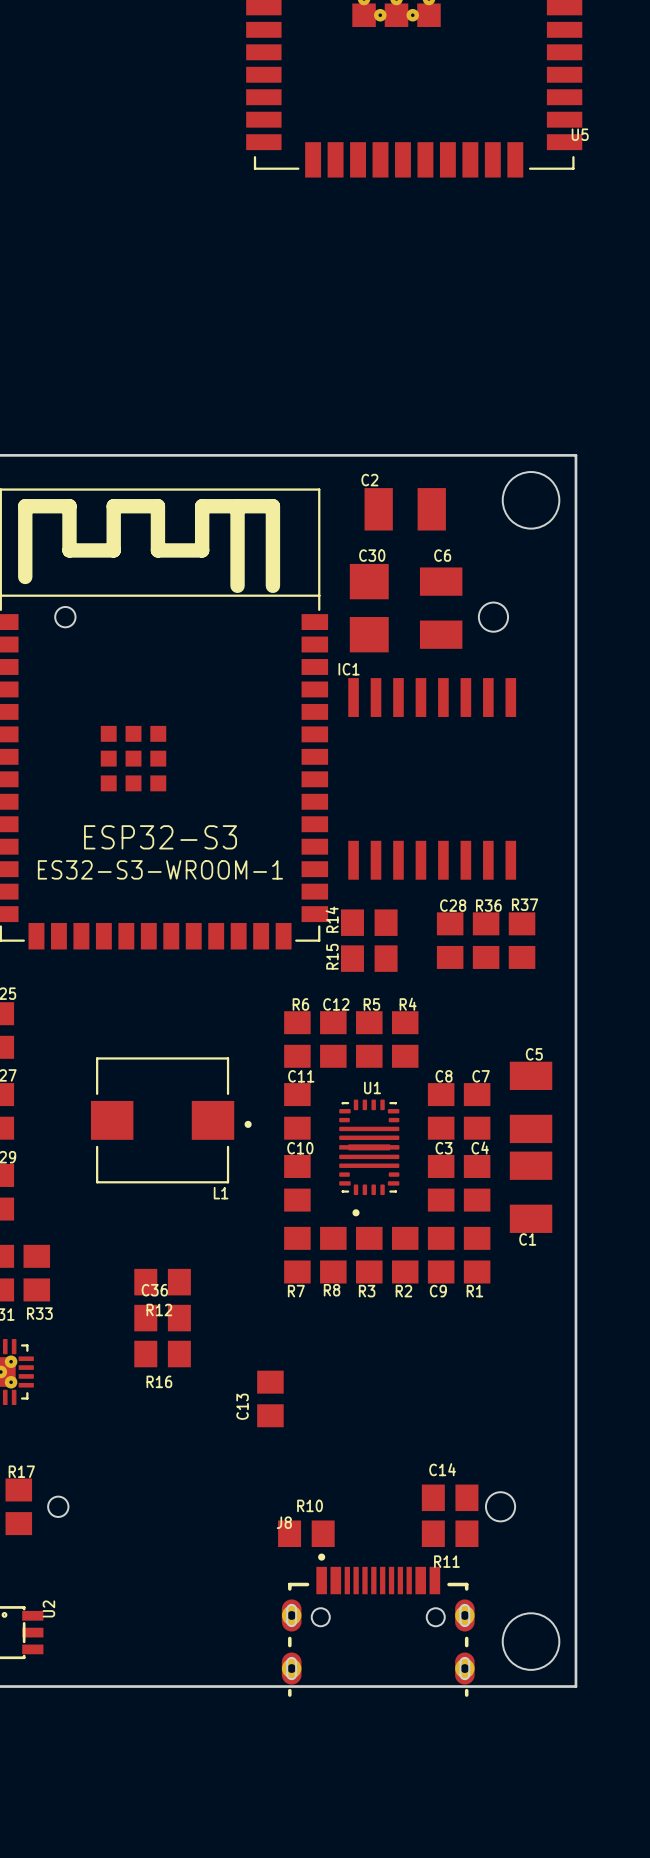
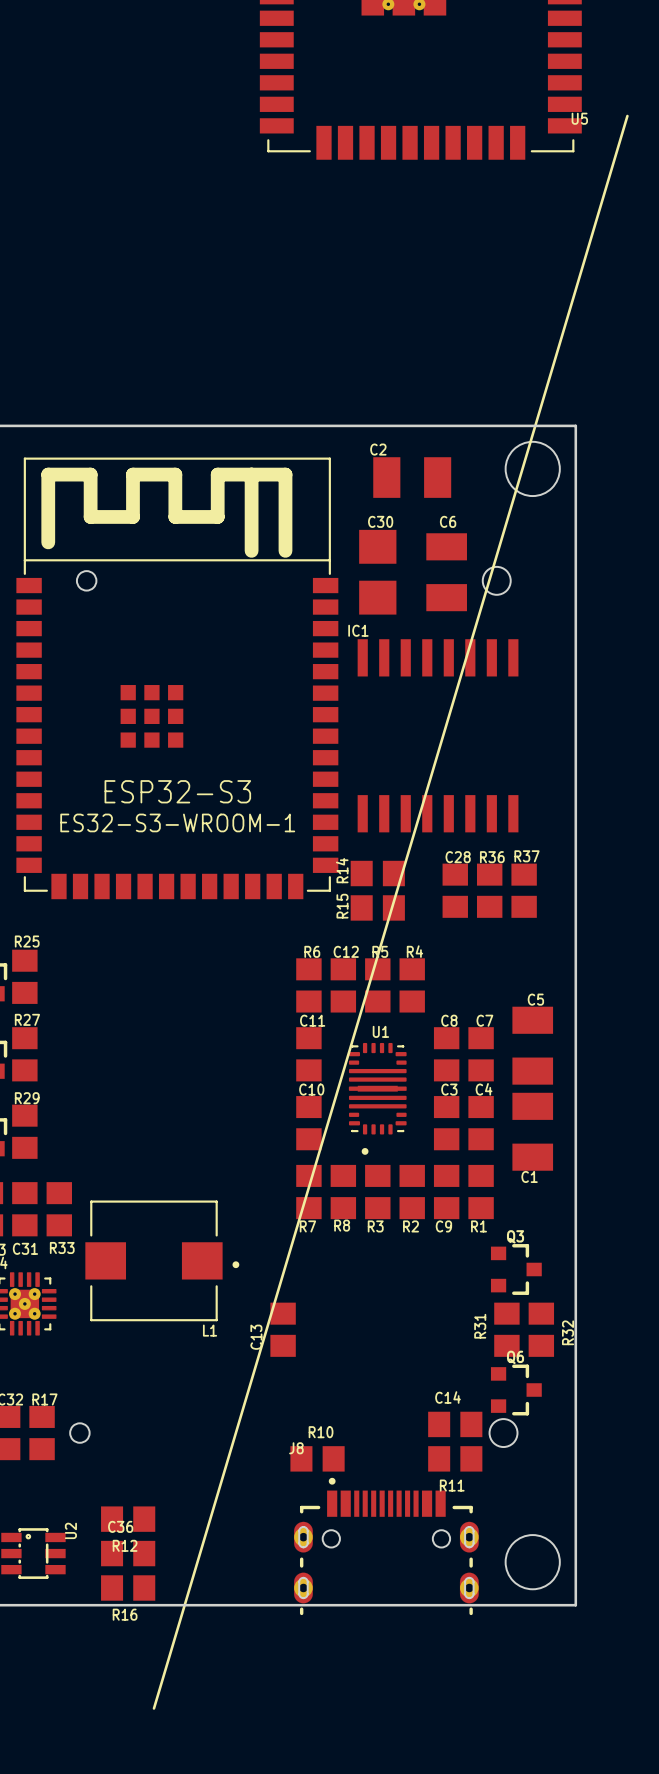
line: none -> (627, 116) (153, 1708)
L1 position: (171, 1120) -> (162, 1260)
R12 position: (162, 1282) -> (128, 1519)
C36 position: (162, 1318) -> (128, 1553)
Q3: none -> (516, 1269)
R16 position: (162, 1354) -> (128, 1587)
R31: none -> (506, 1329)
R32: none -> (541, 1329)
Q6: none -> (516, 1390)

